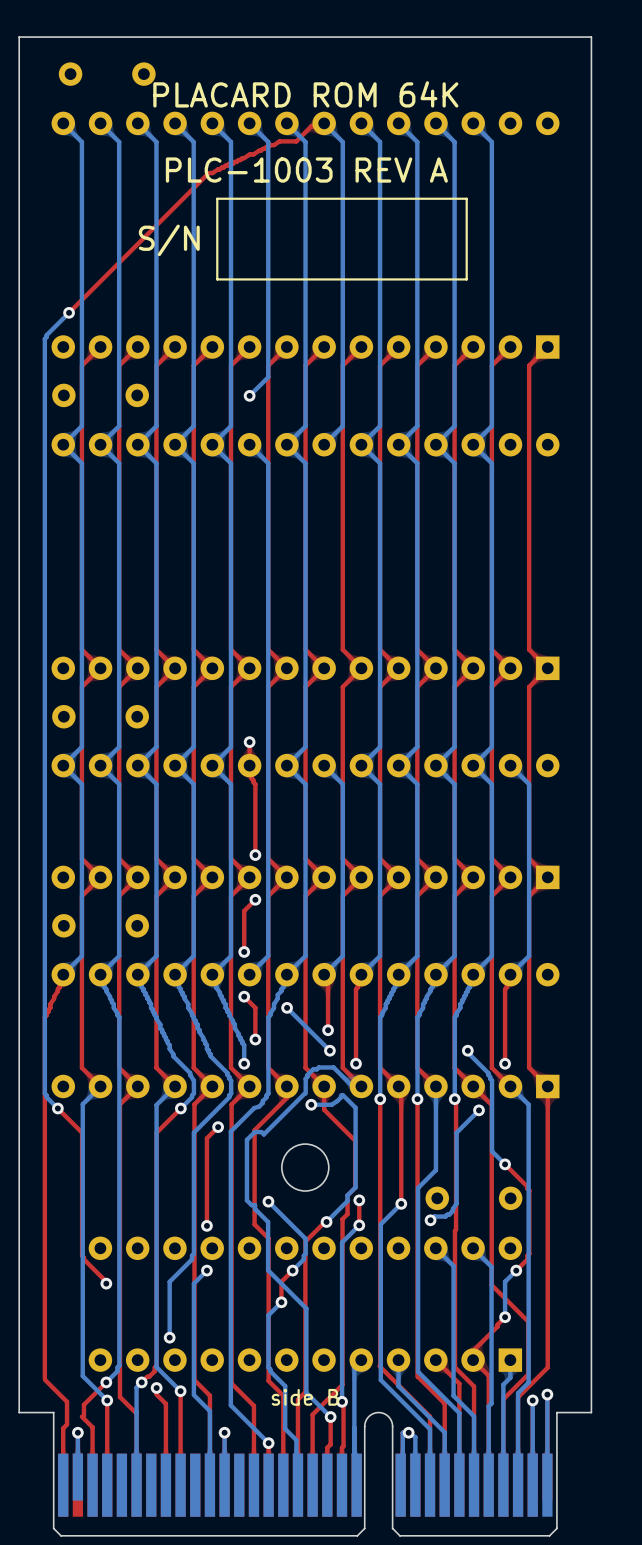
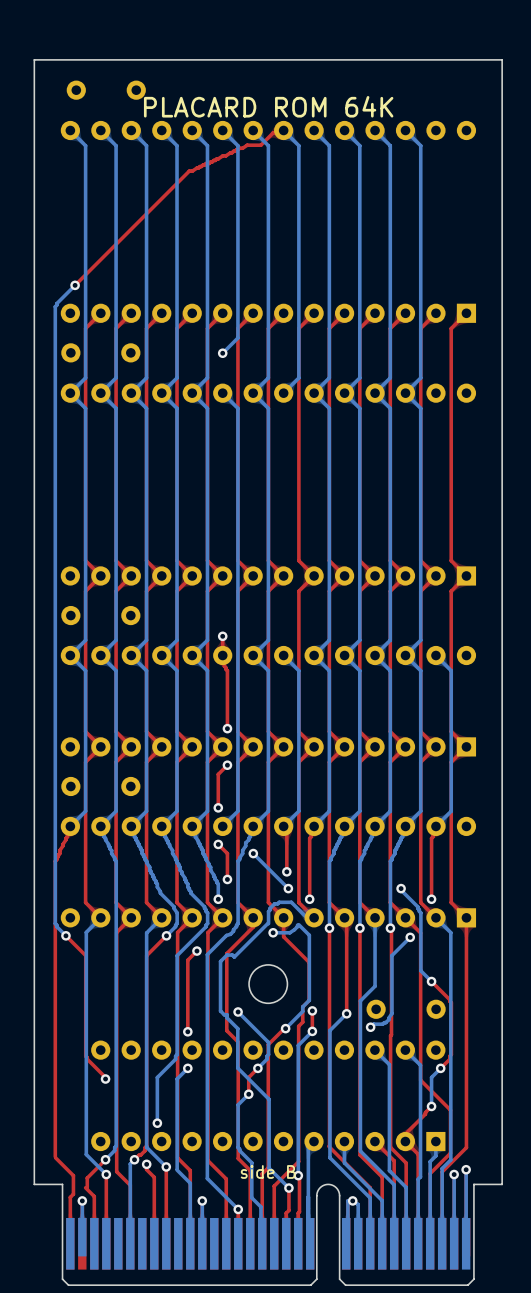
text: PLC-1003 REV A (306, 170) -> none
line: (466, 198) (217, 198) (217, 279) (466, 279) (466, 198) -> none
text: S/N (169, 240) -> none

